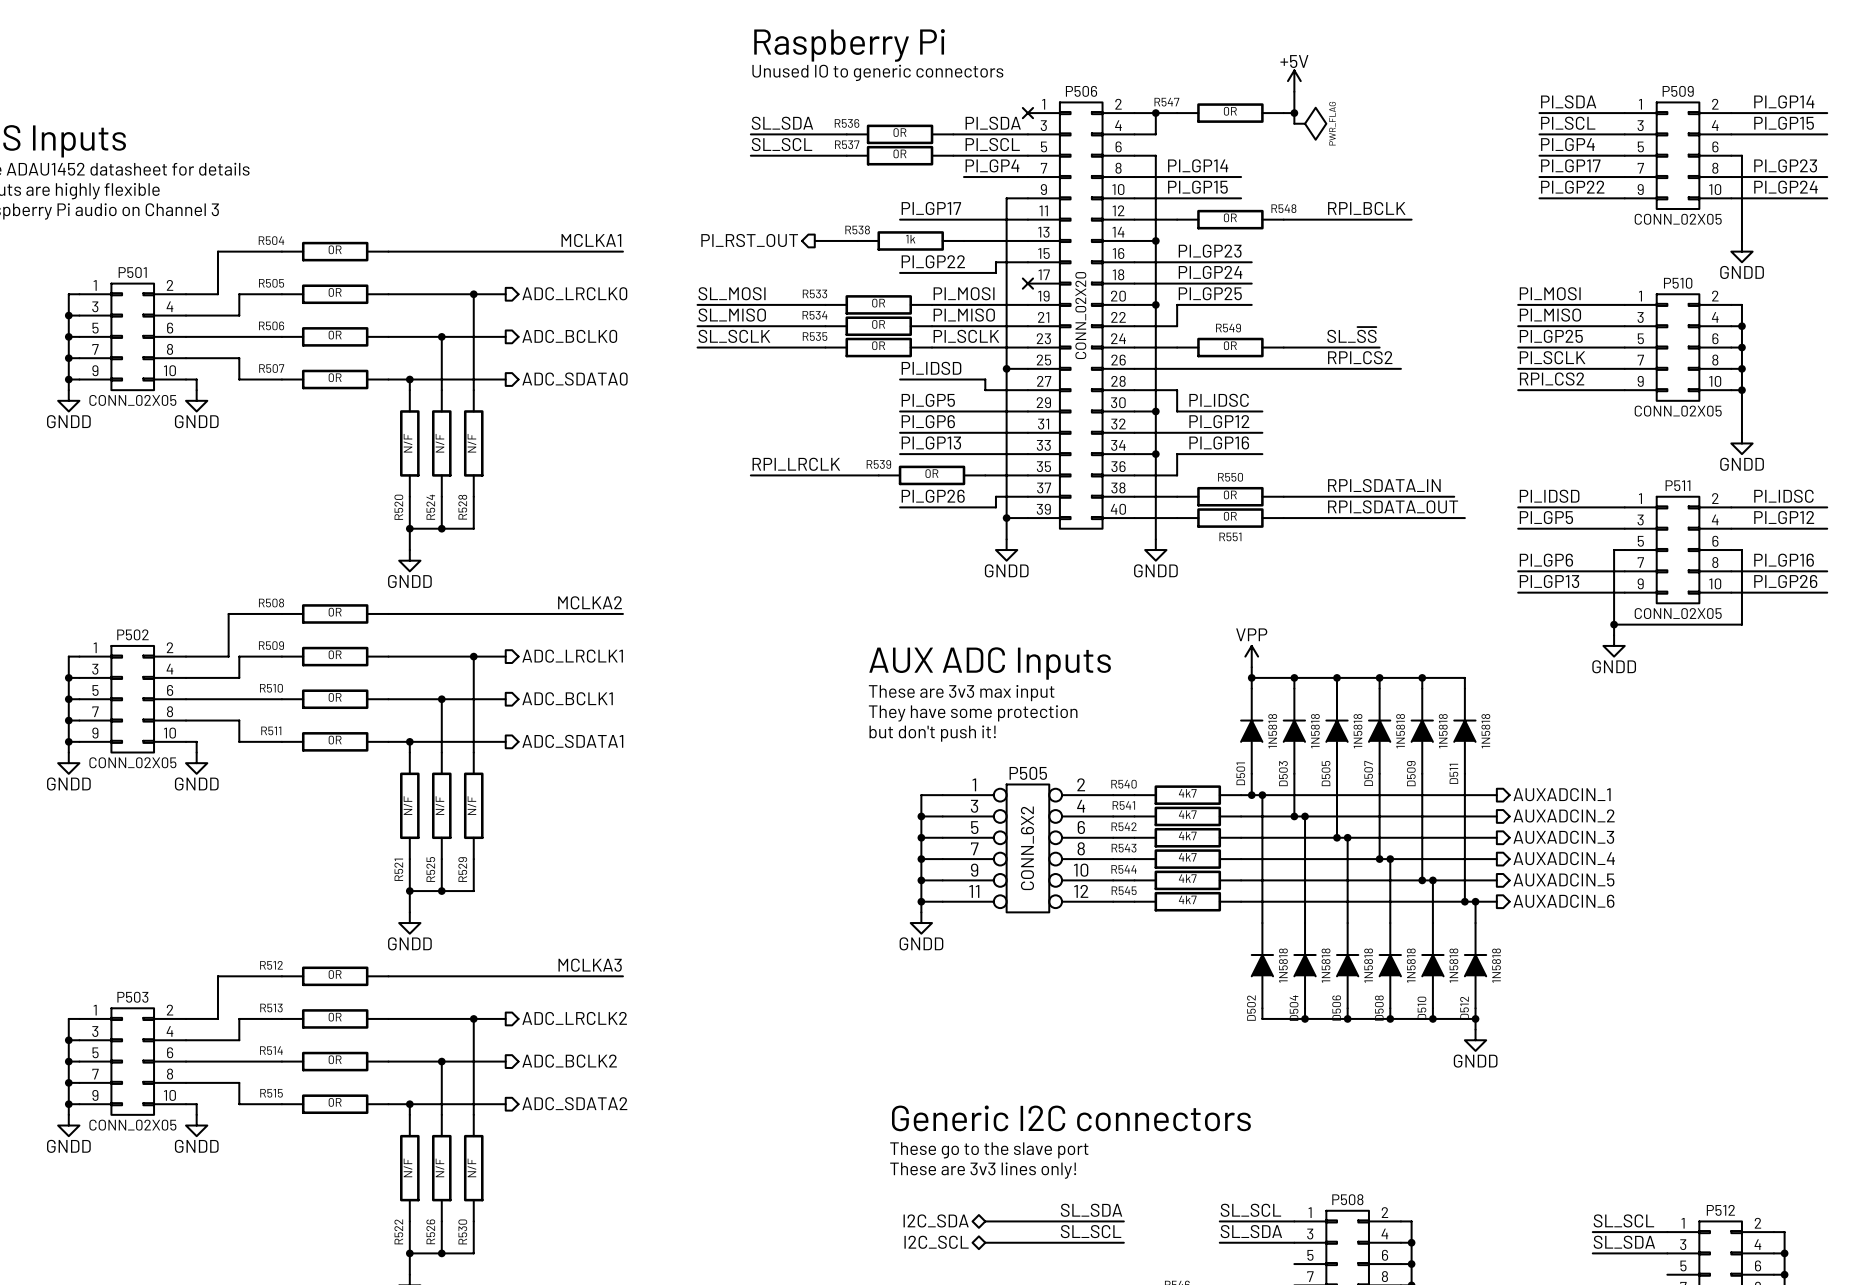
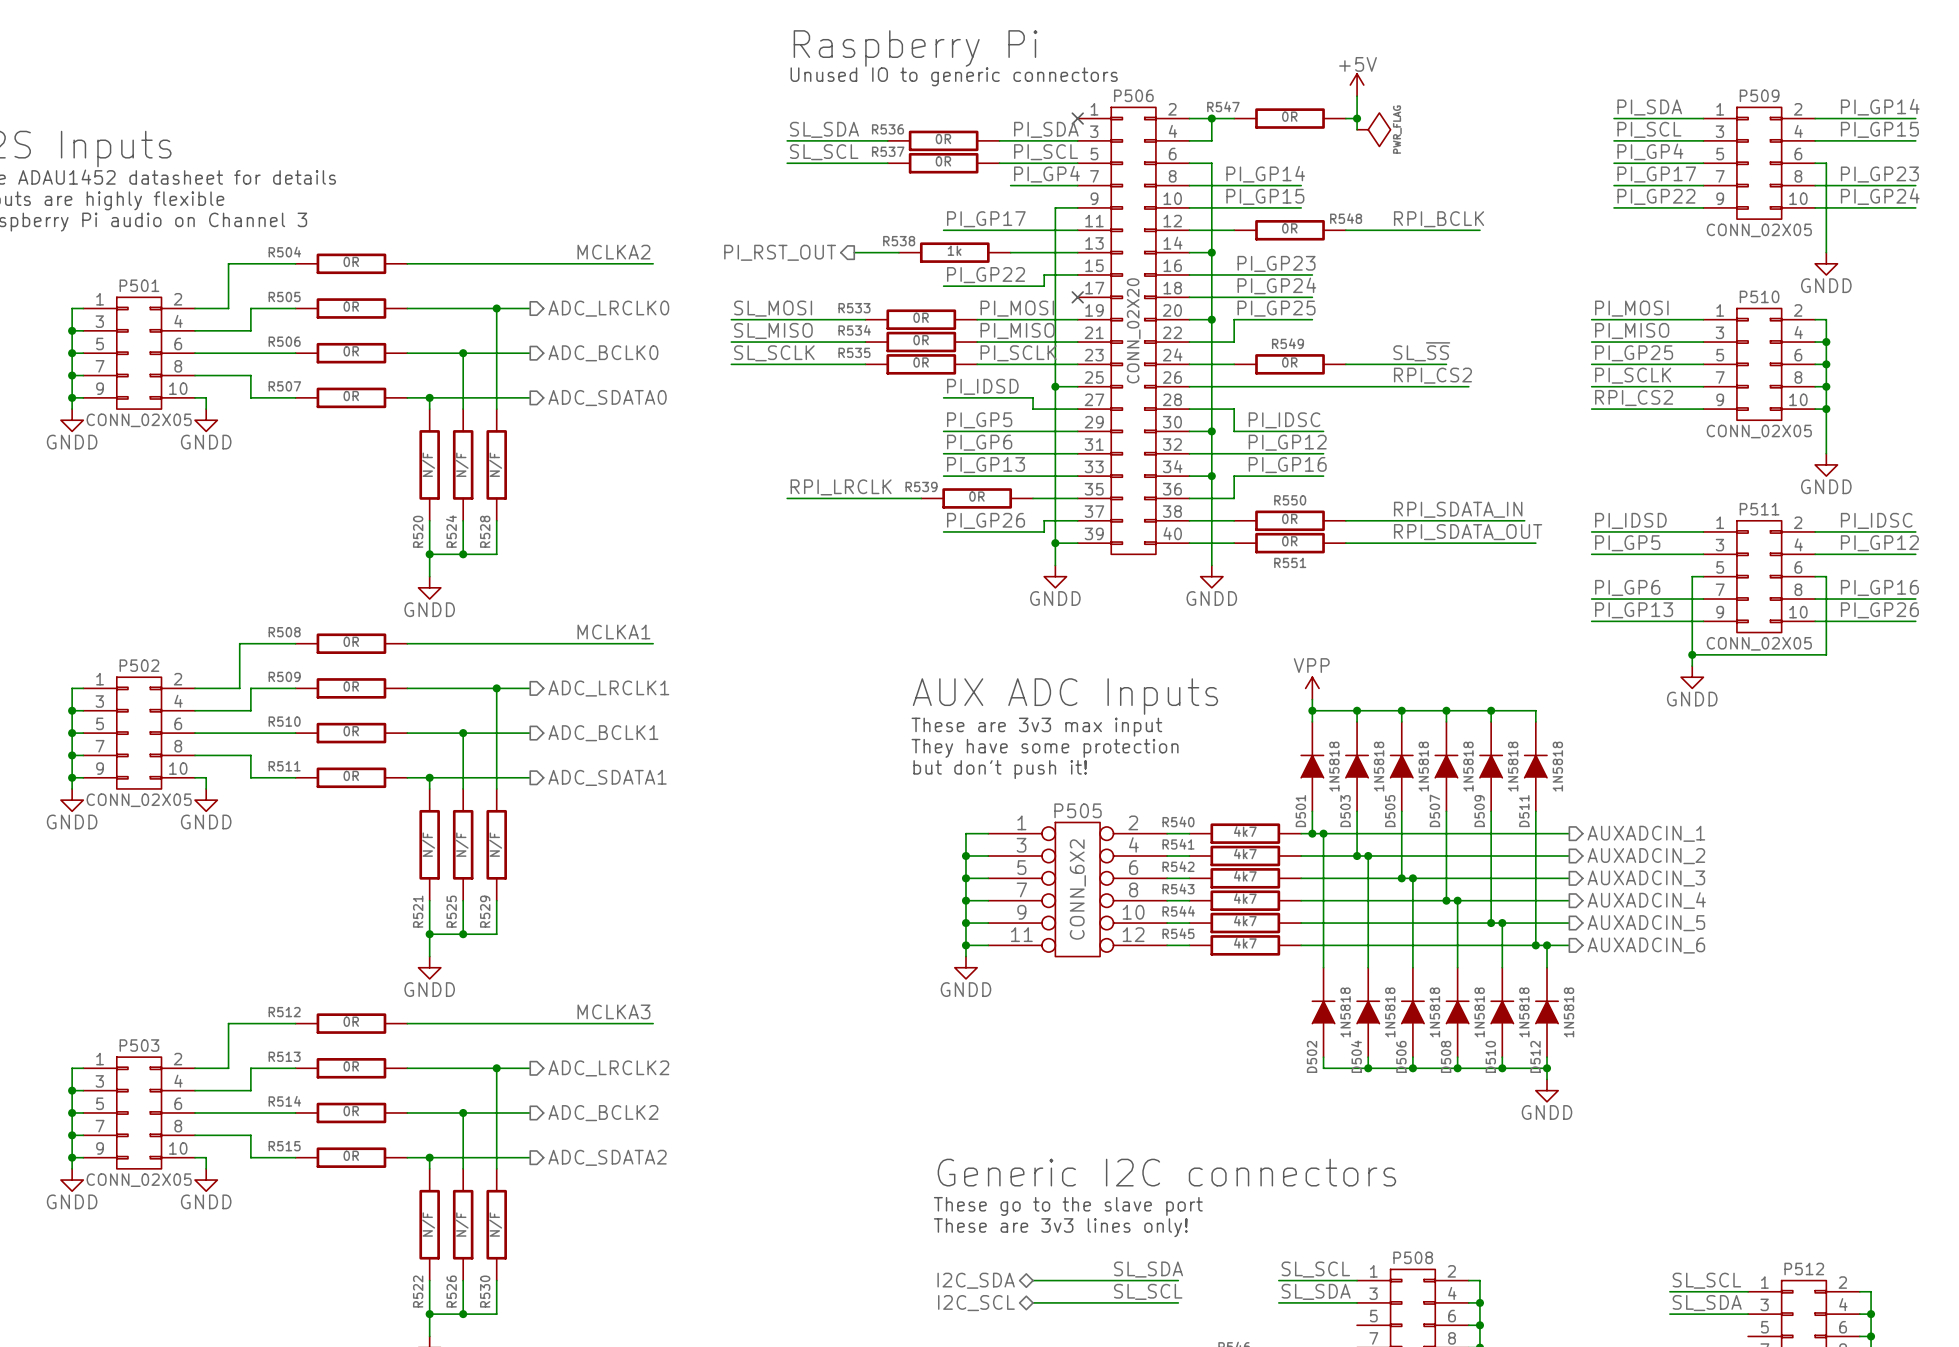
label: MCLKA1 (591, 240) -> MCLKA2 (613, 252)
label: MCLKA2 (590, 602) -> MCLKA1 (613, 632)

